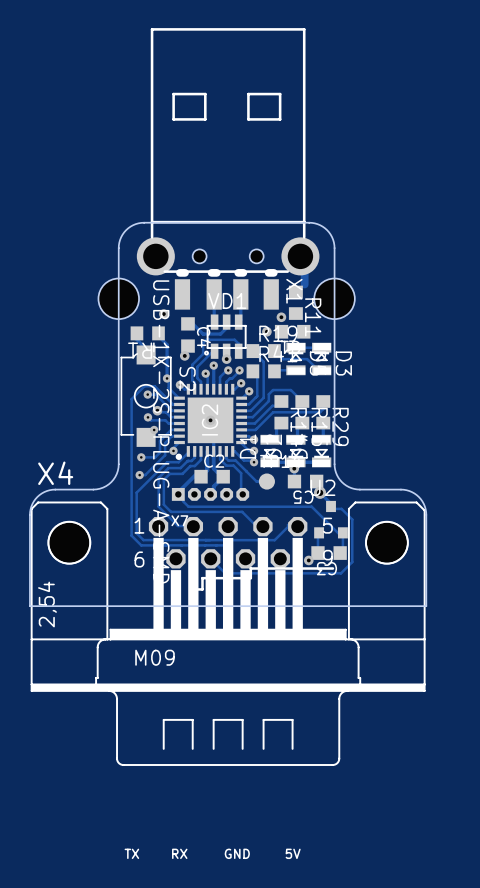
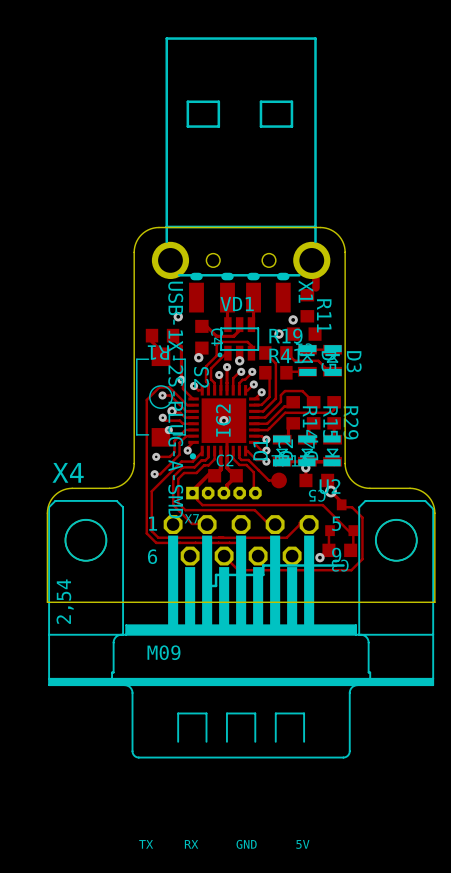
part: (118, 298) -> none
part: (334, 298) -> none

